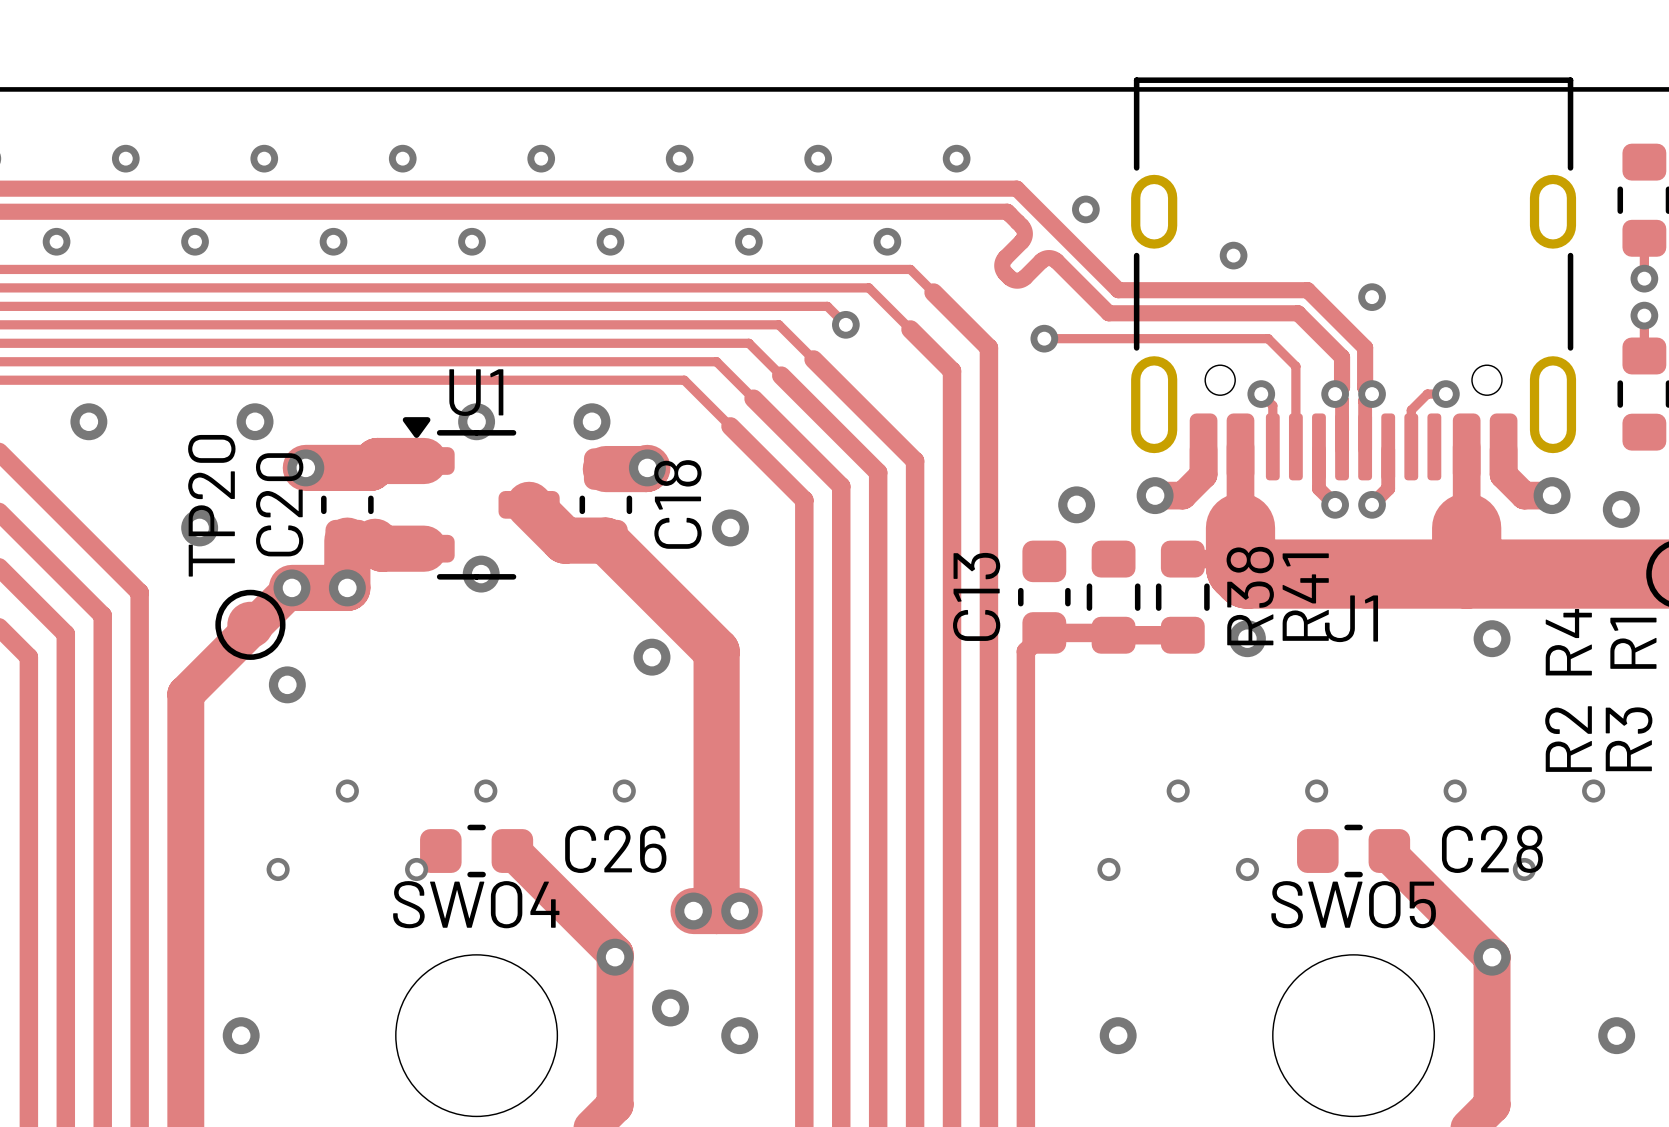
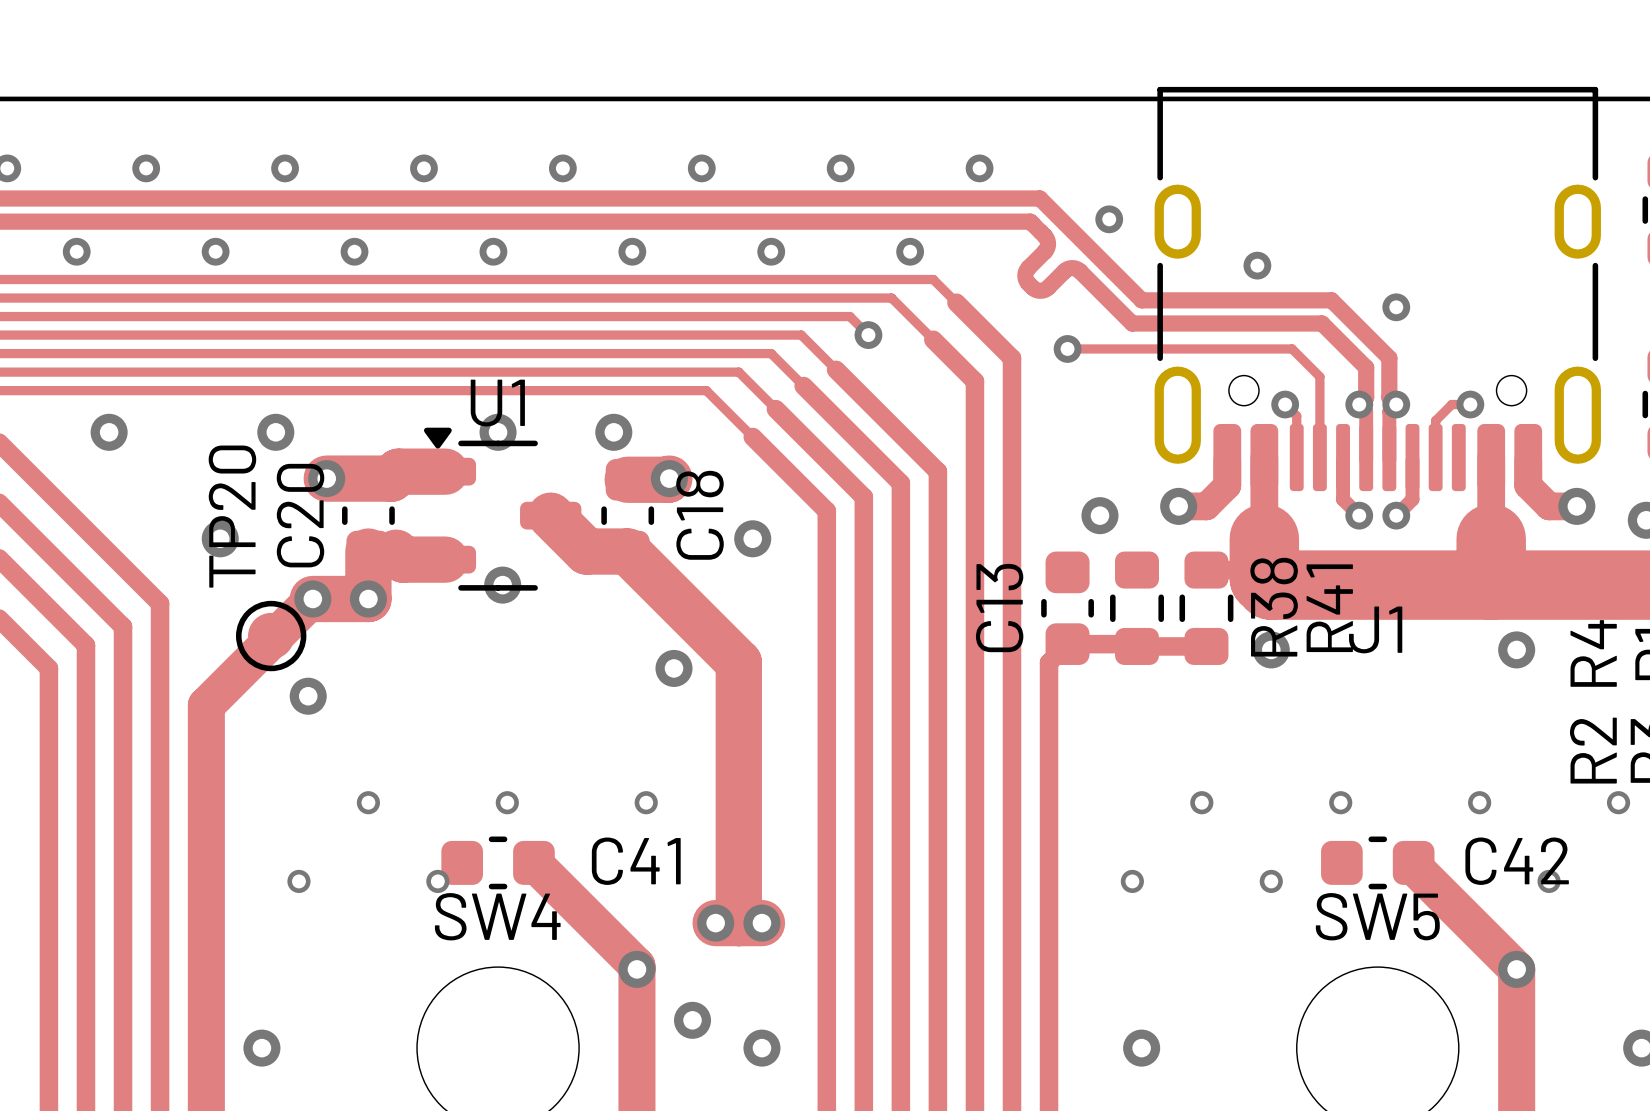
C26 name: C26 (615, 849) -> C41 (636, 861)
C28 name: C28 (1492, 849) -> C42 (1517, 861)
SWO4 name: SWO4 (476, 904) -> SW4 (497, 916)
SWO5 name: SWO5 (1353, 904) -> SW5 (1377, 916)

